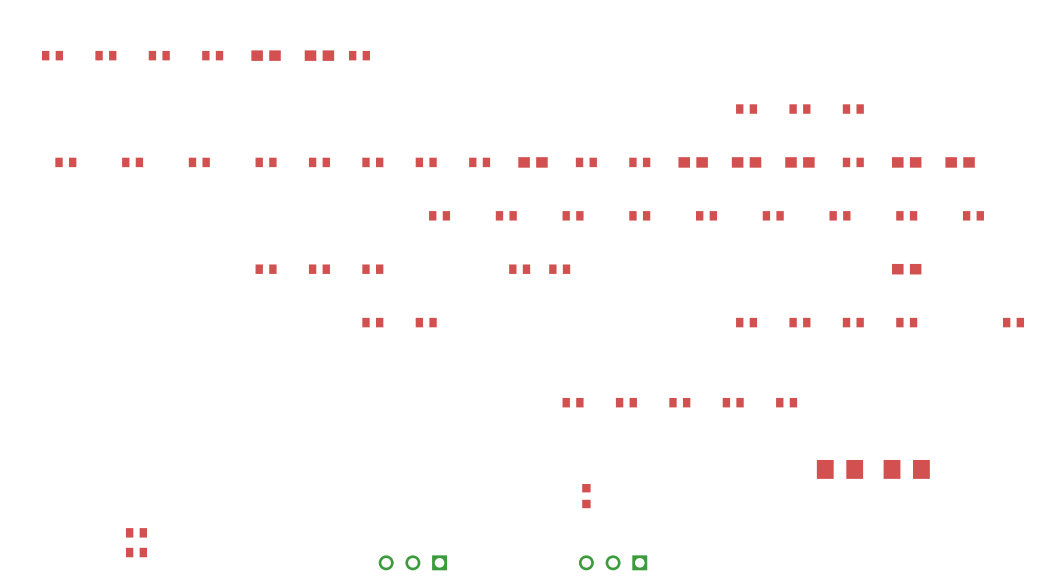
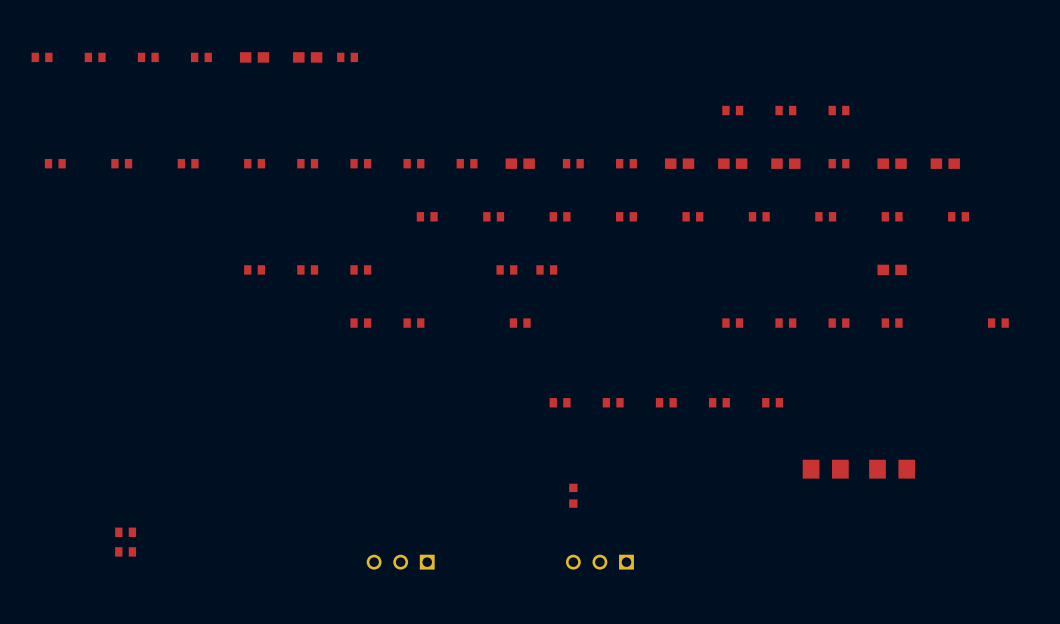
part: none -> (520, 323)

